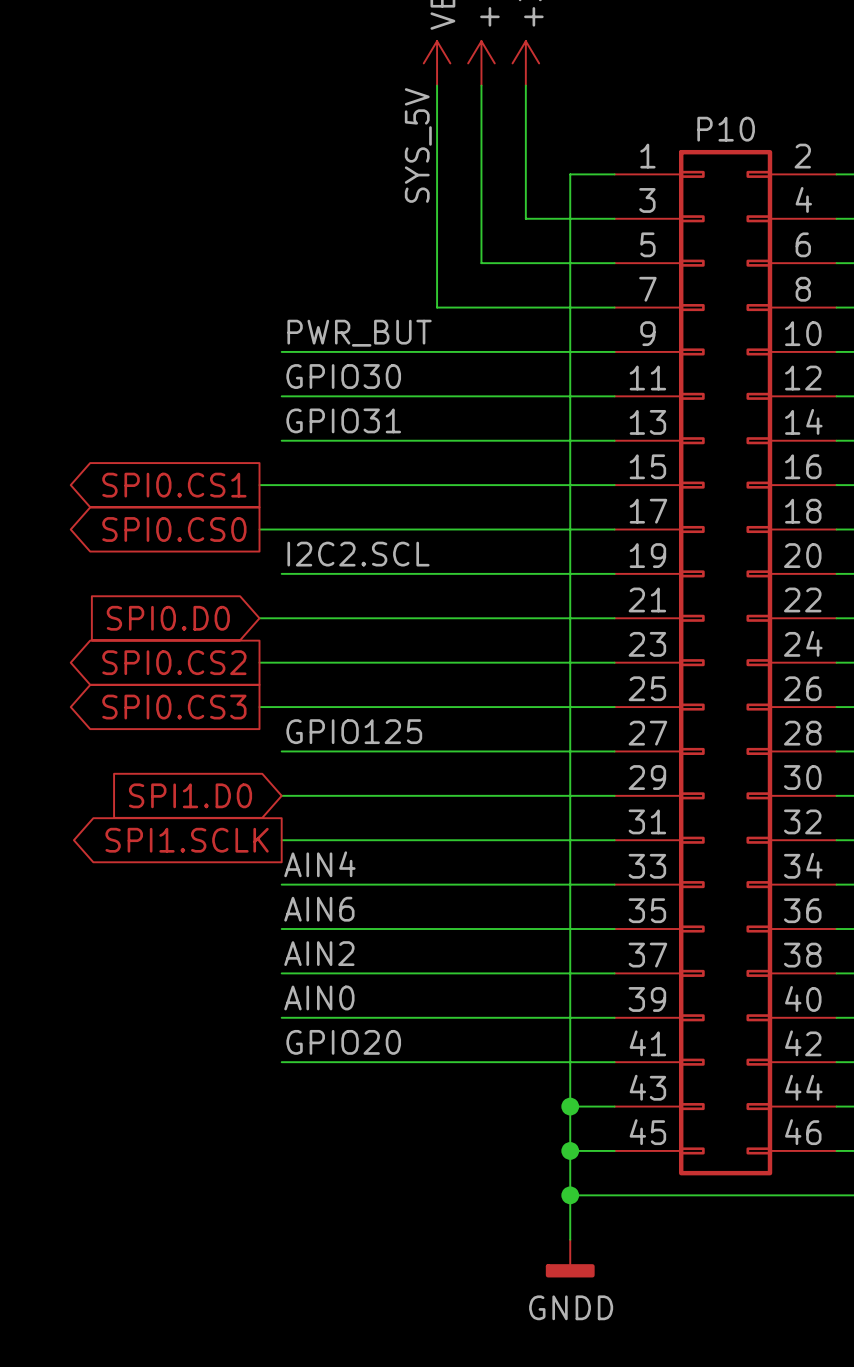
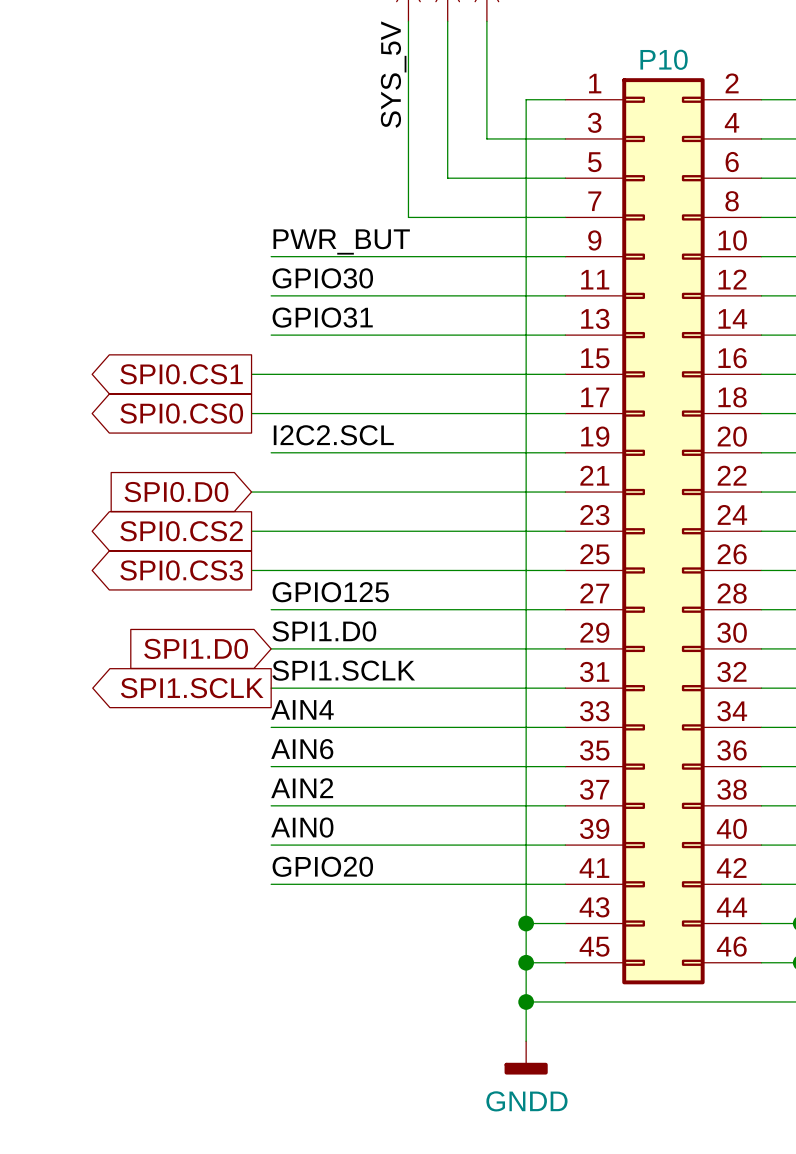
label: none -> SPI1.D0 (324, 631)
label: none -> SPI1.SCLK (343, 670)

